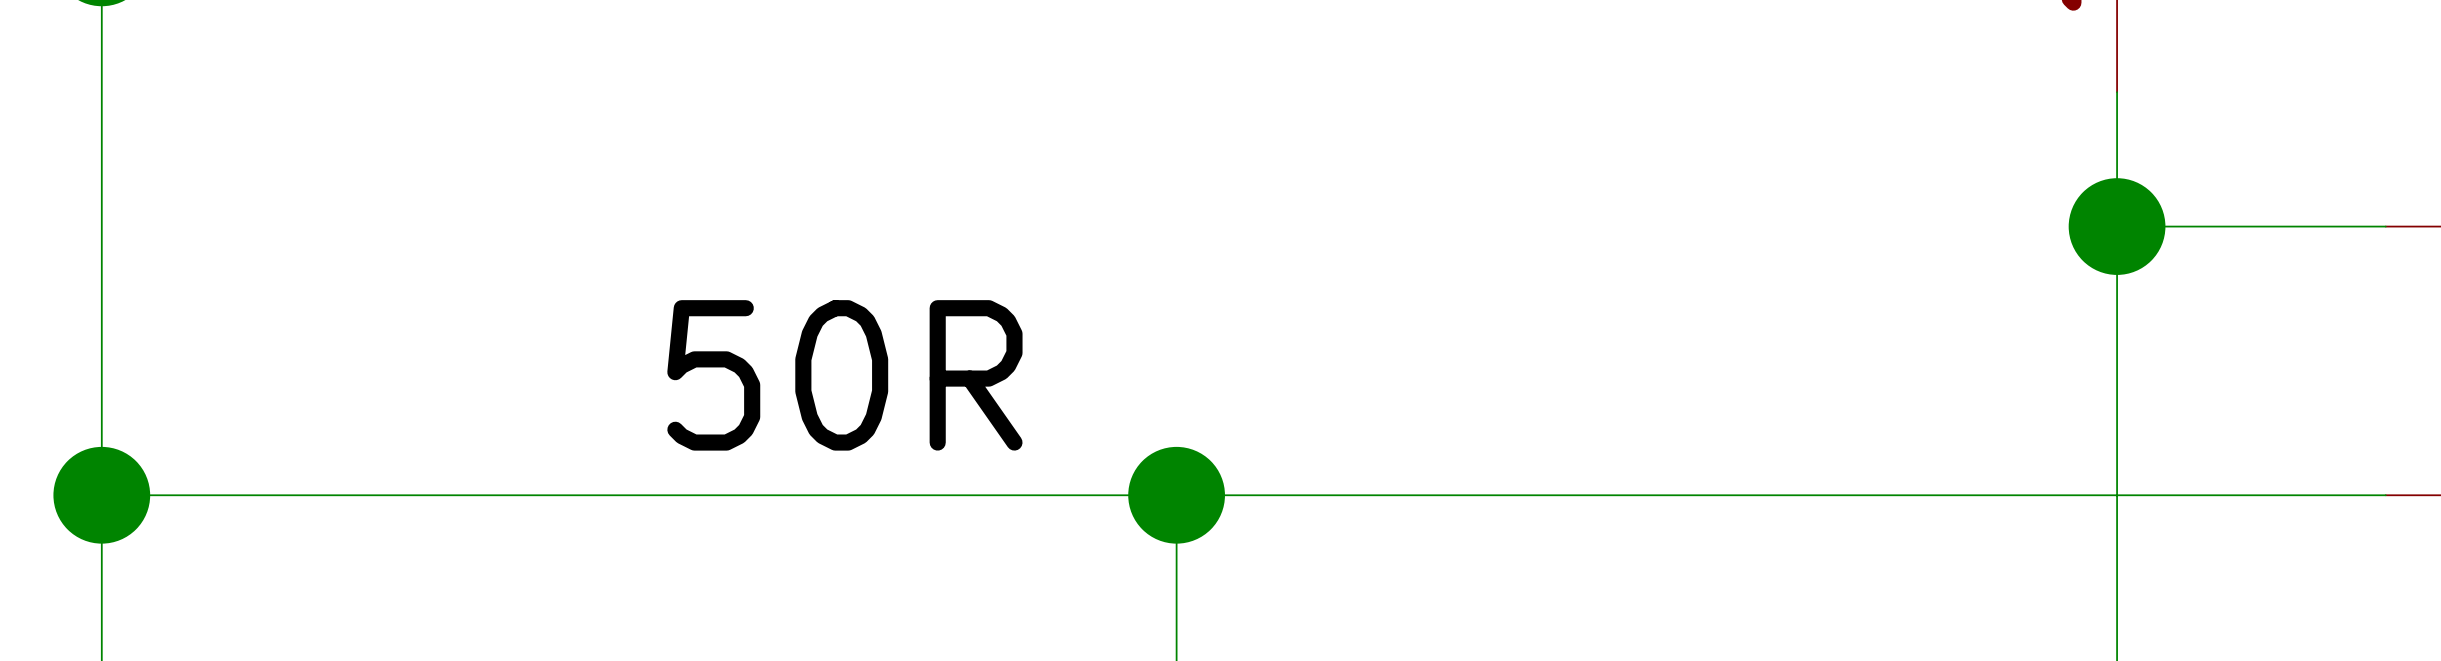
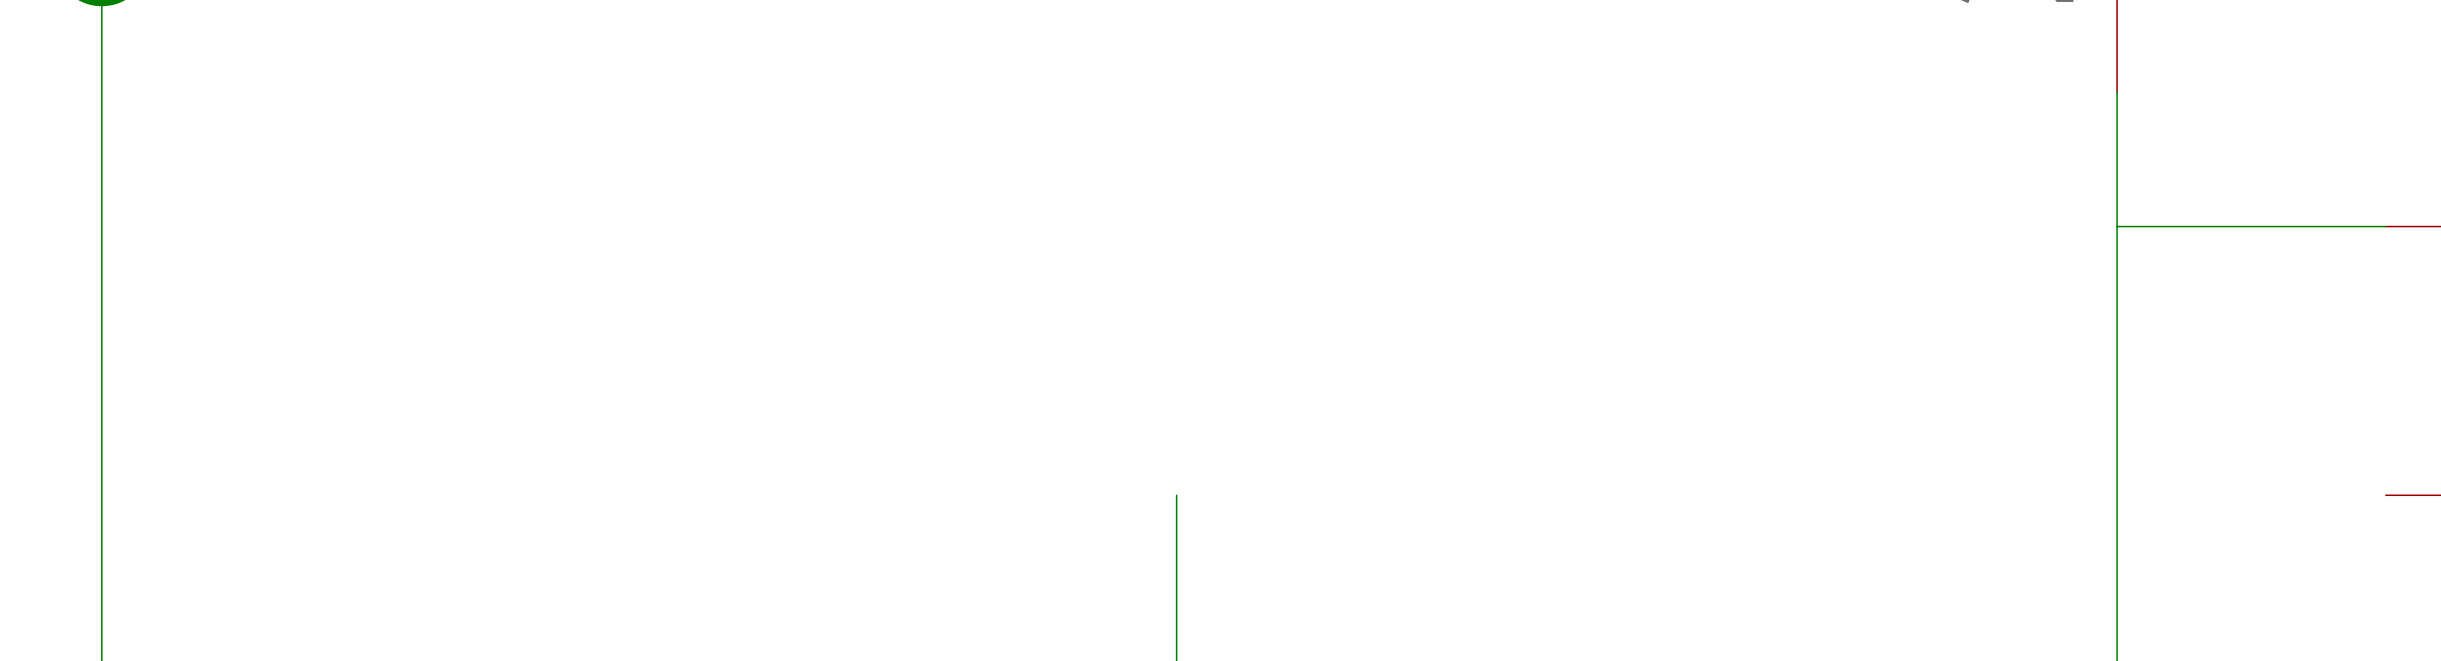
junction: (2117, 226) -> none
label: 50R (844, 375) -> none
wire: (101, 495) (2385, 495) -> none
junction: (101, 495) -> none
junction: (1176, 495) -> none

